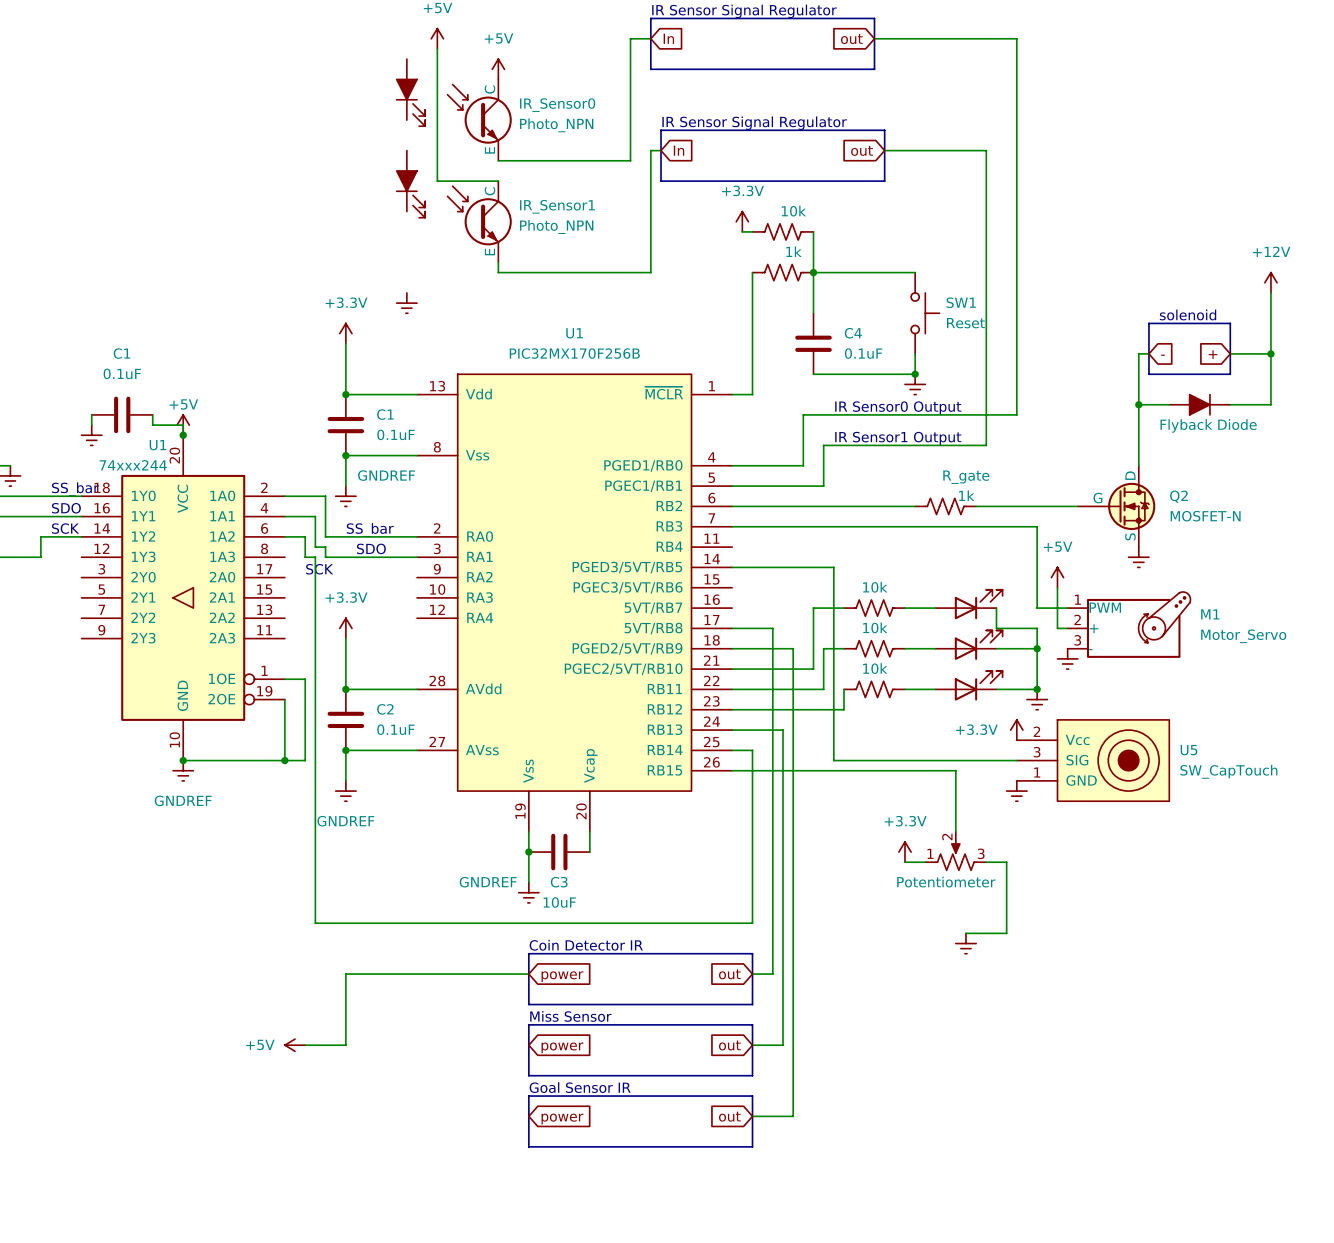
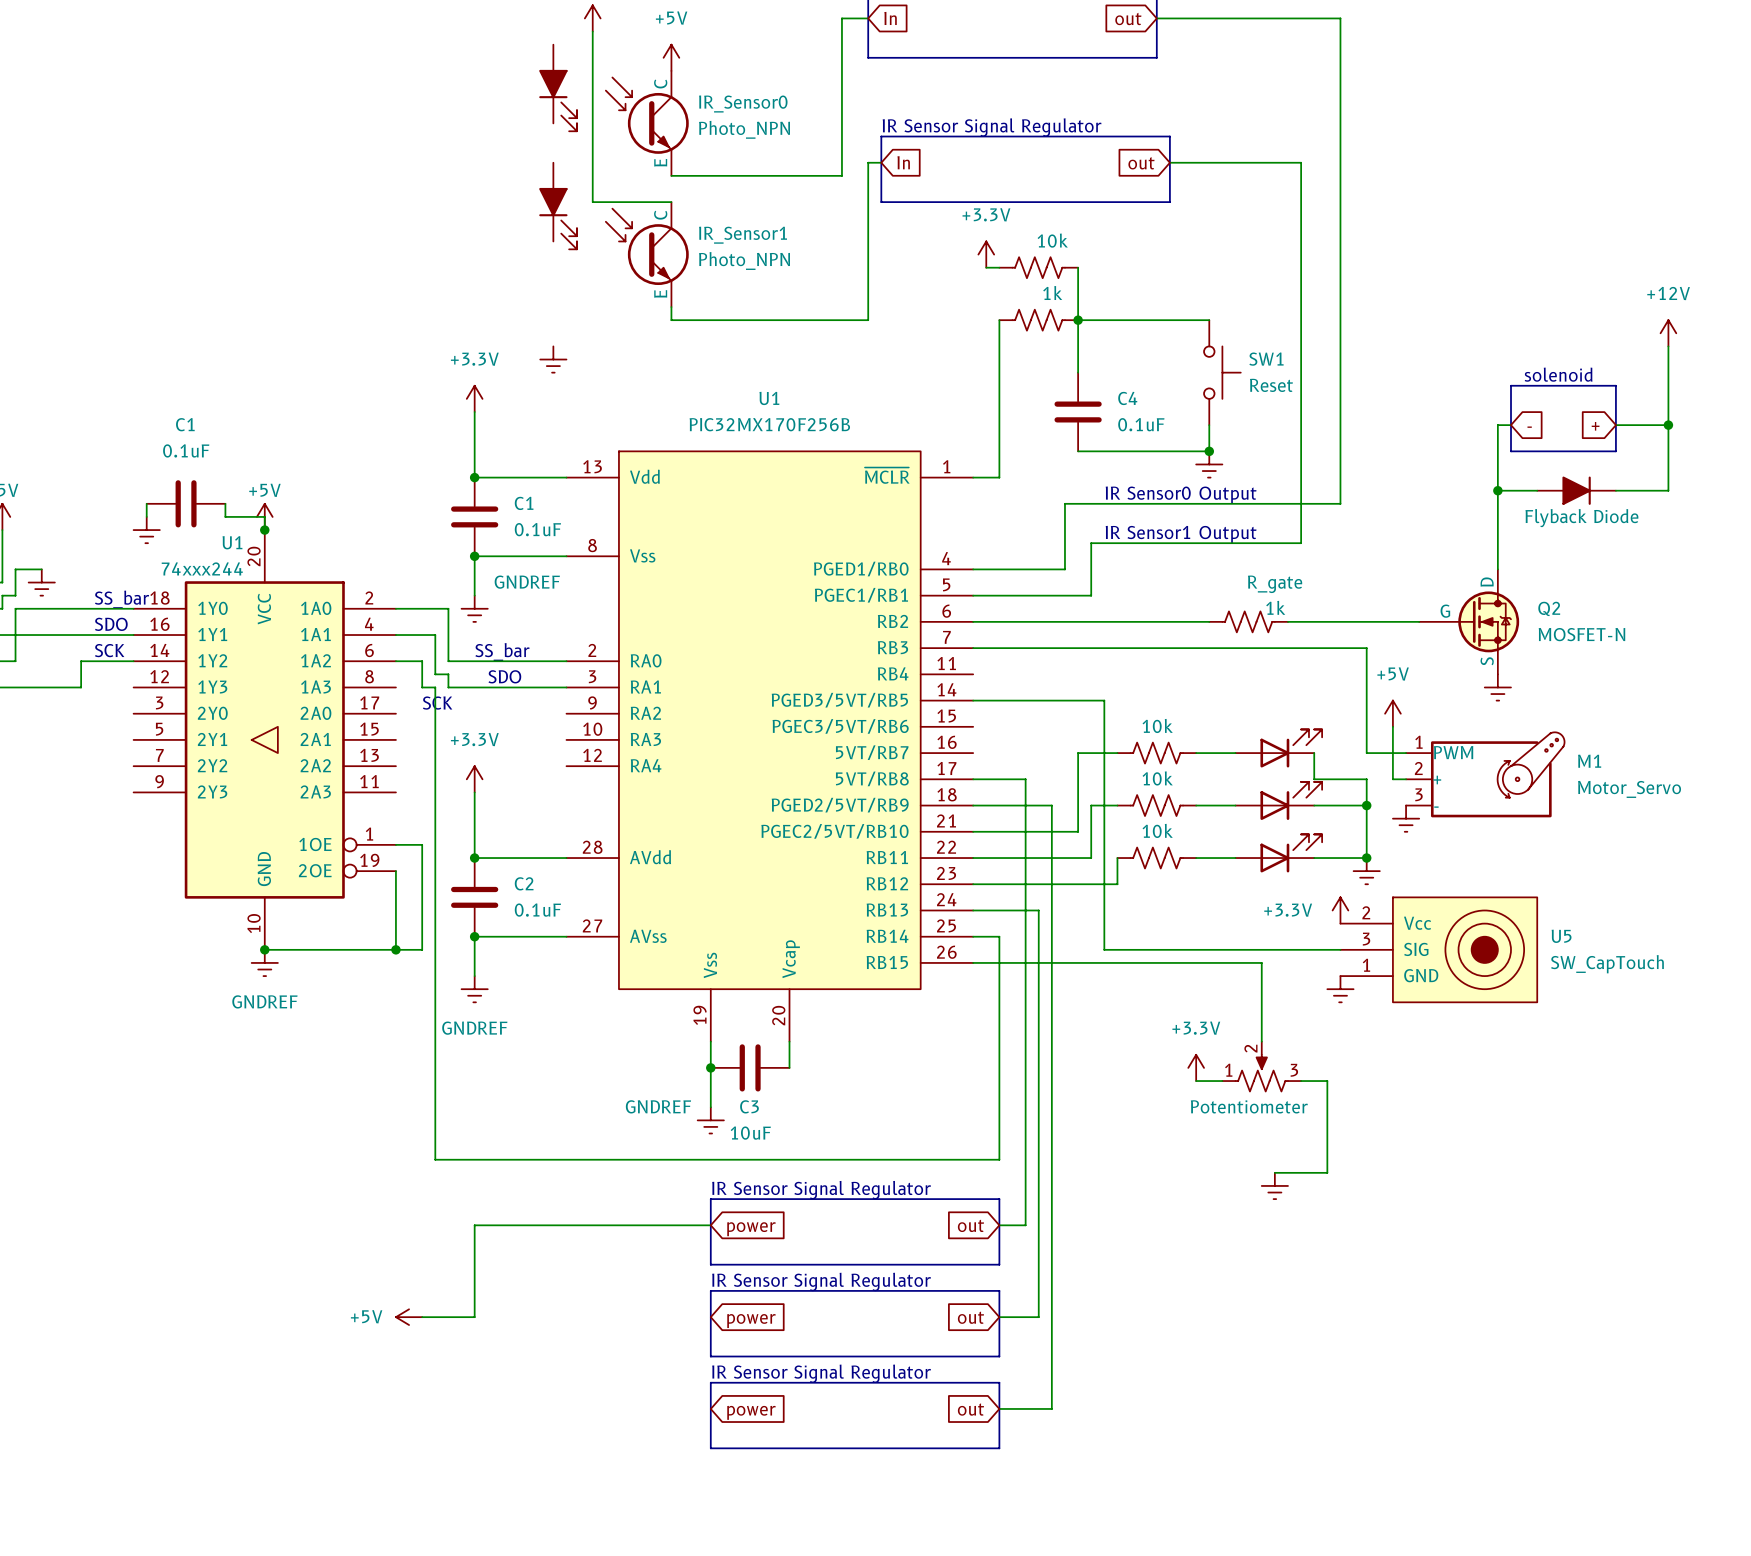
text: Coin Detector IR (586, 945) -> IR Sensor Signal Regulator (821, 1190)
text: Miss Sensor (570, 1016) -> IR Sensor Signal Regulator (821, 1281)
text: Goal Sensor IR (580, 1087) -> IR Sensor Signal Regulator (821, 1373)

